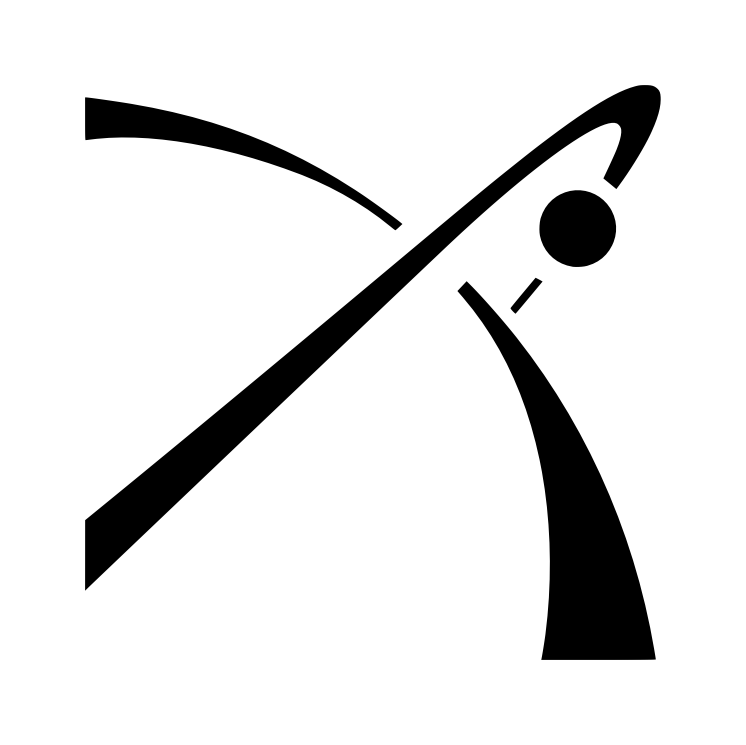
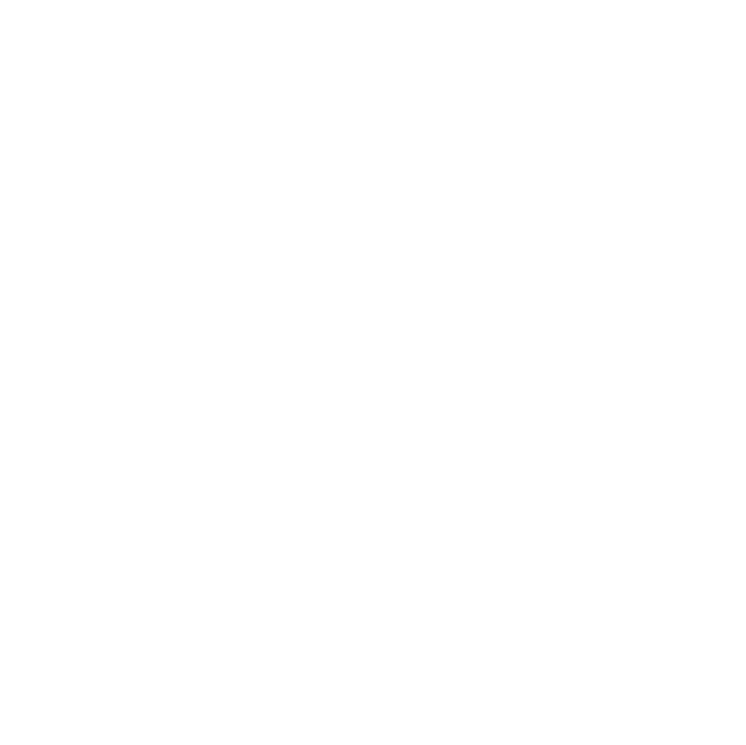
drawing: [85, 85, 661, 660] -> none

